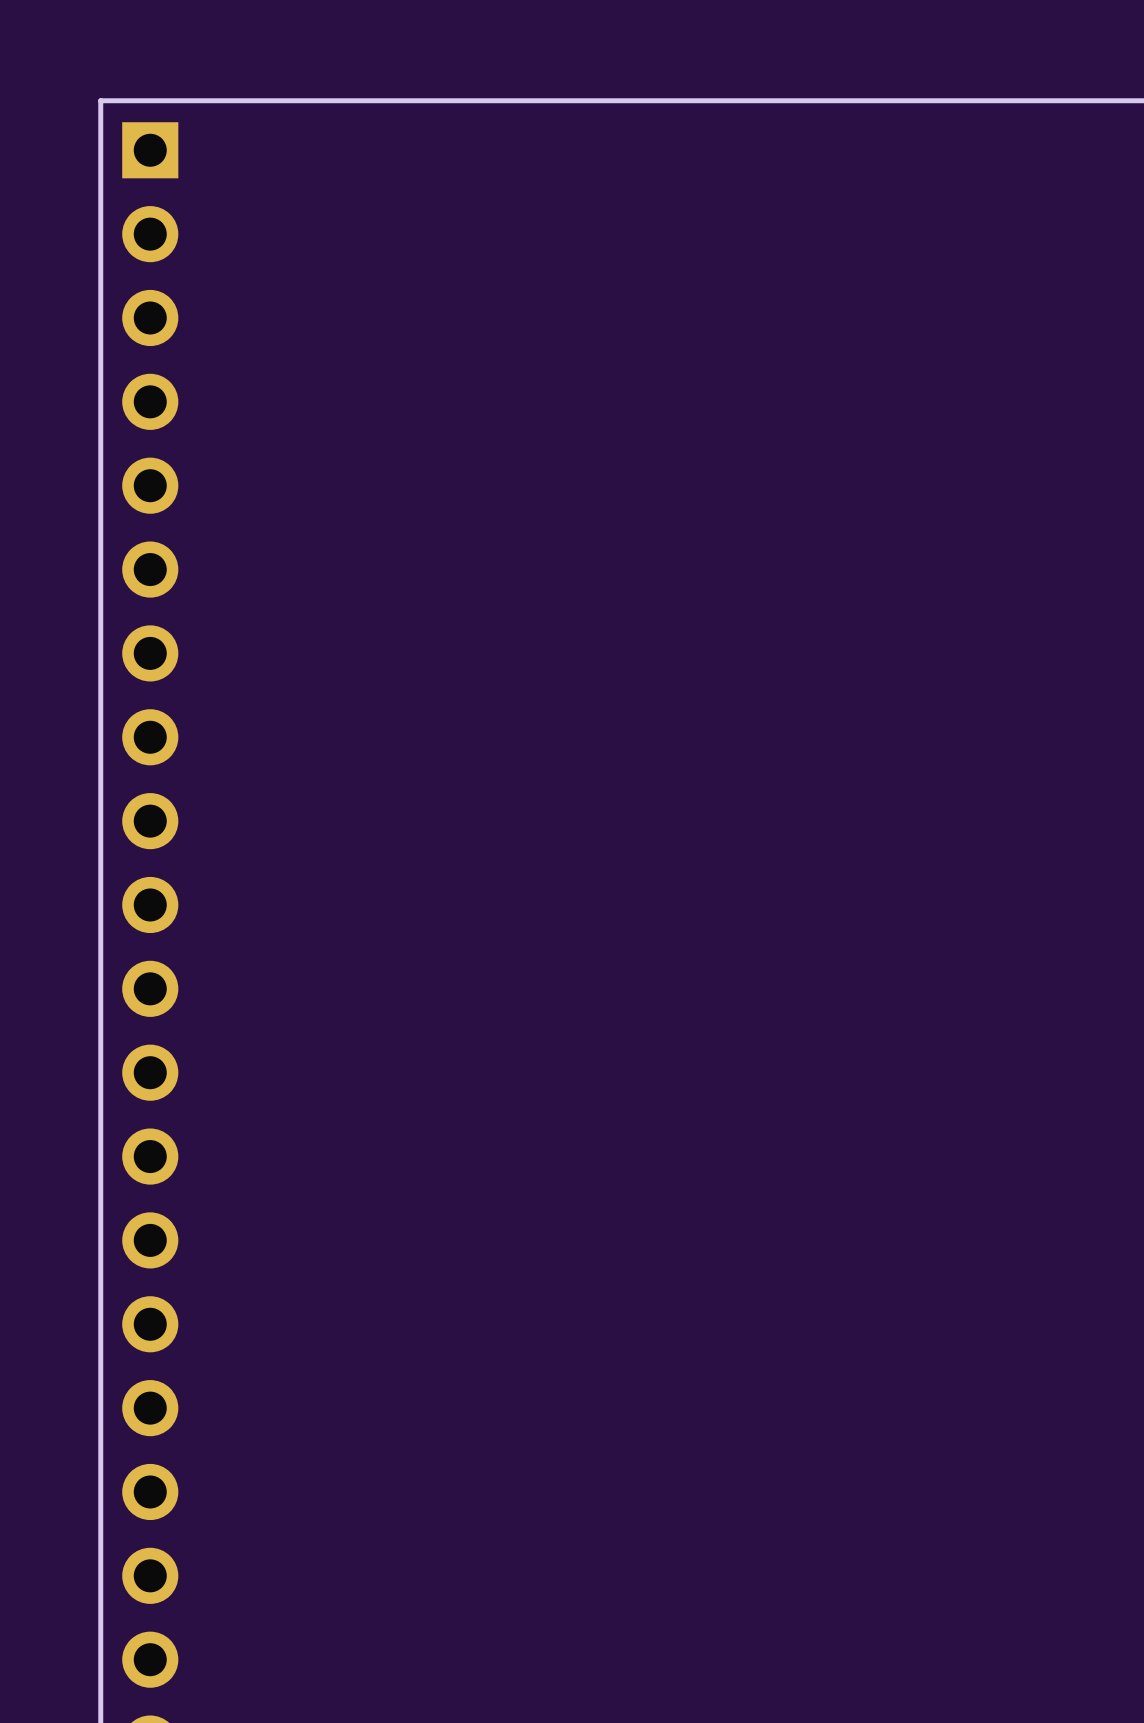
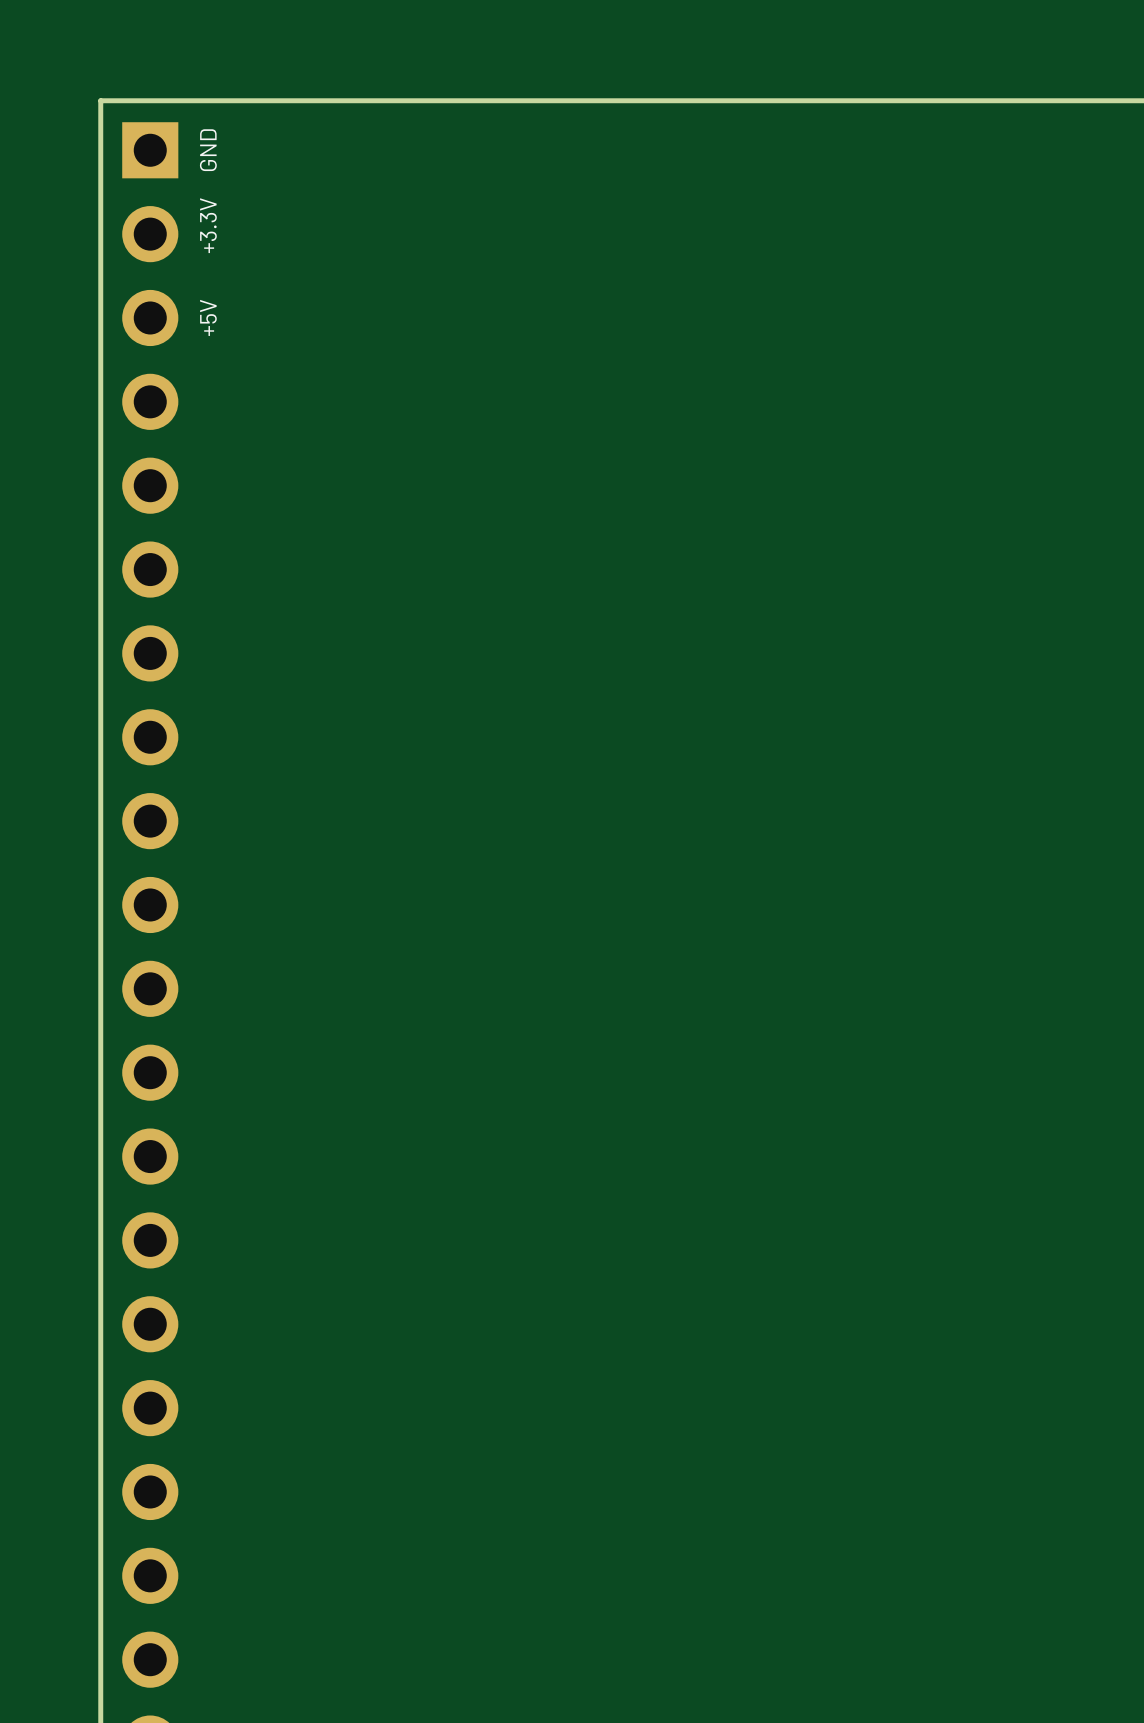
part text: none -> GND (208, 150)
part text: none -> +3.3V (208, 225)
part text: none -> +5V (208, 317)

